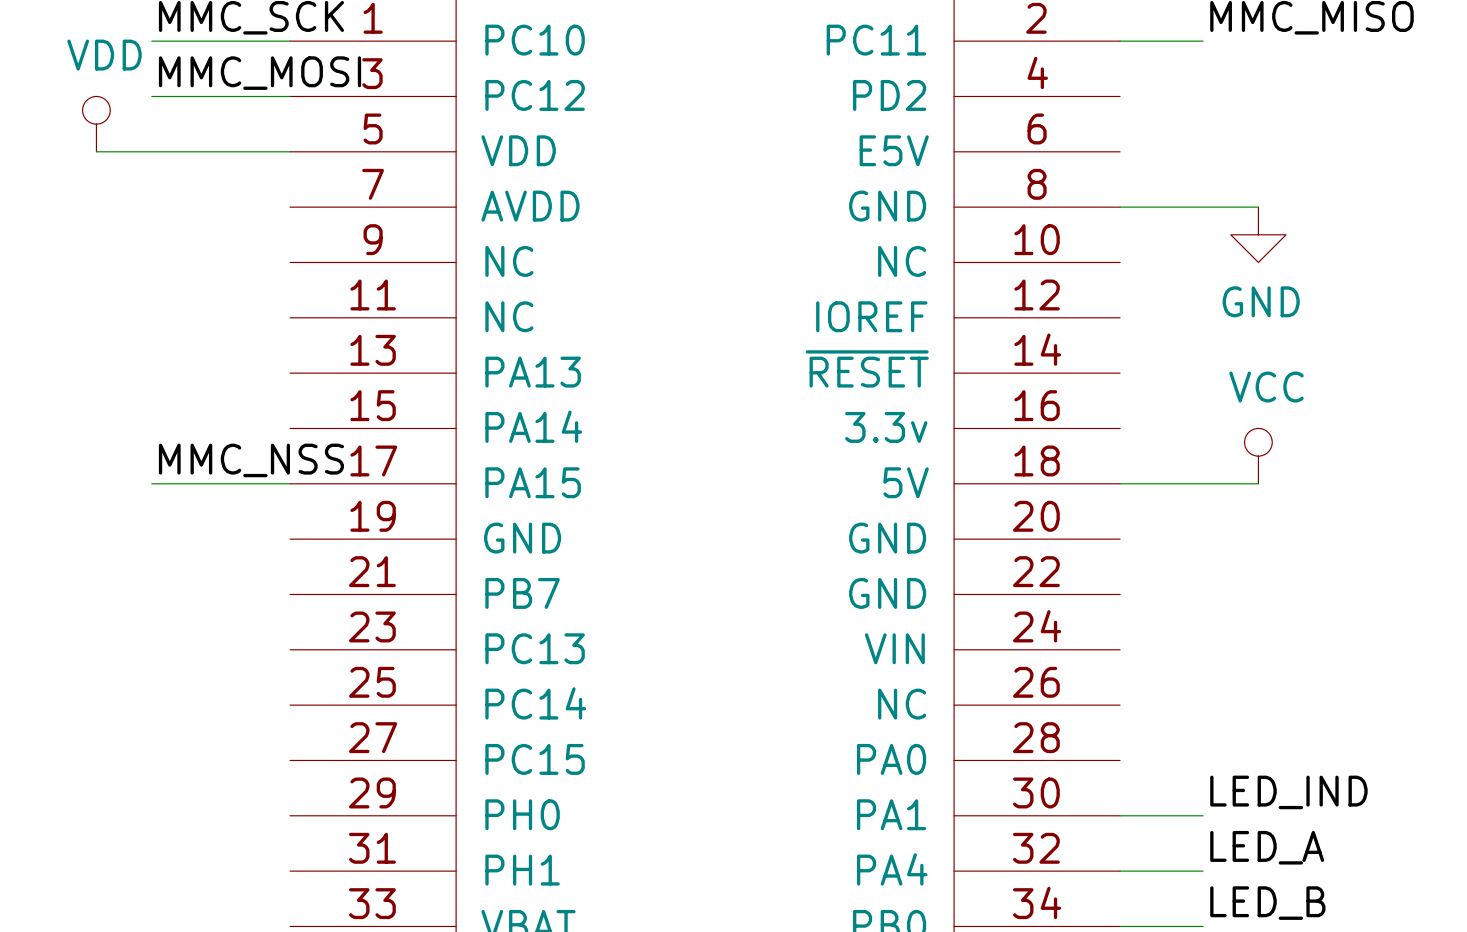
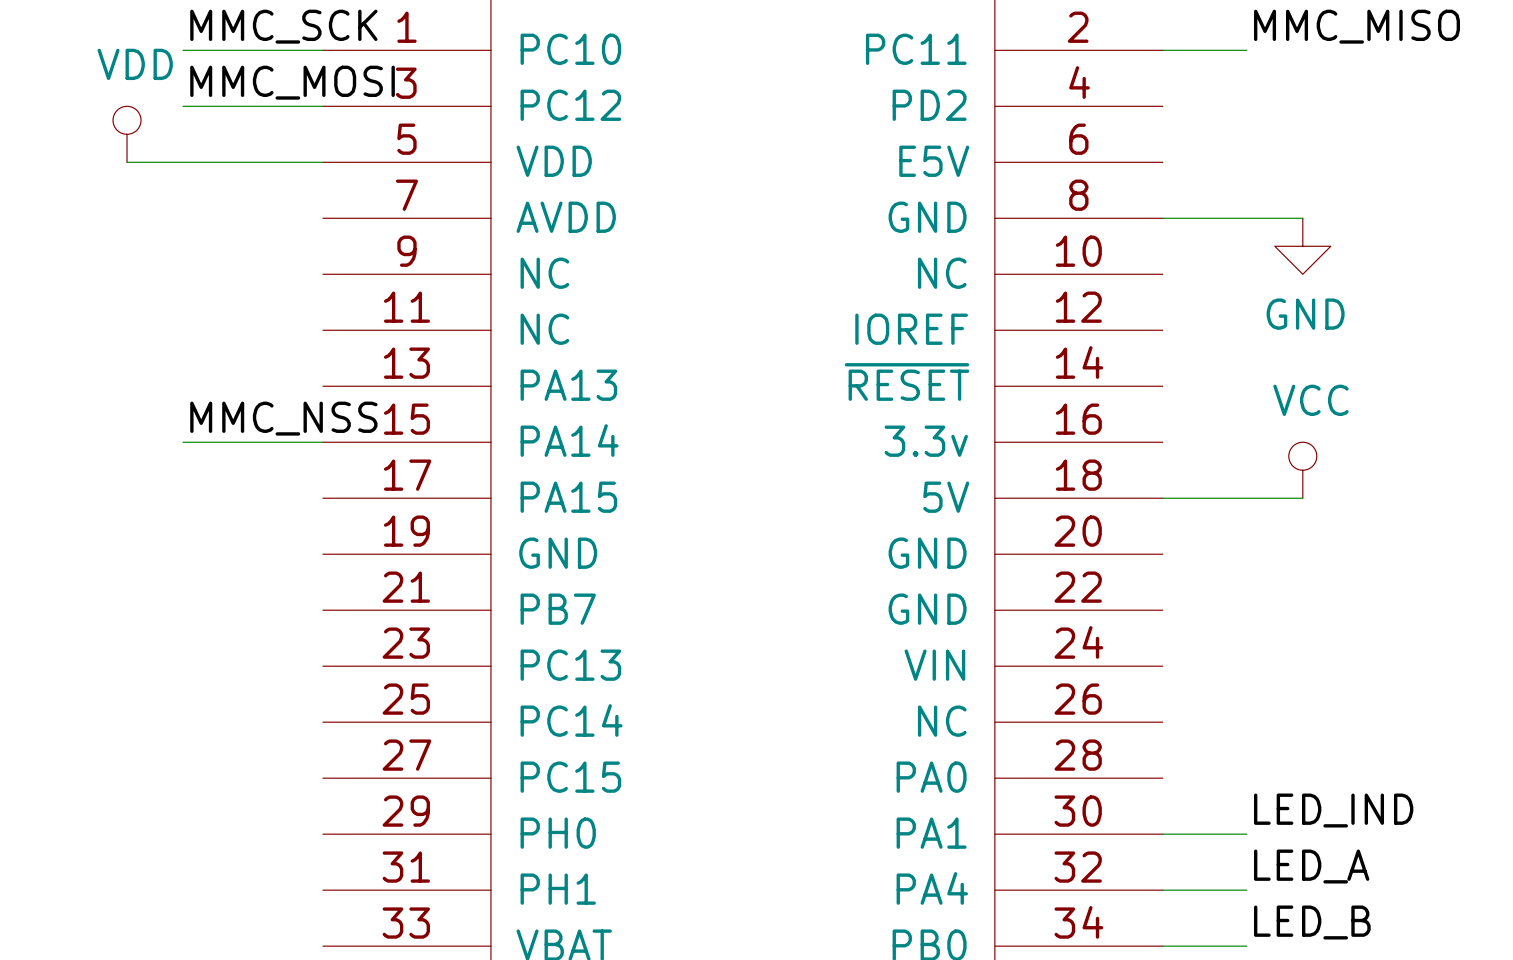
label position: MMC_NSS (251, 460) -> MMC_NSS (283, 418)
wire: (151, 483) (290, 483) -> (183, 442) (322, 442)

